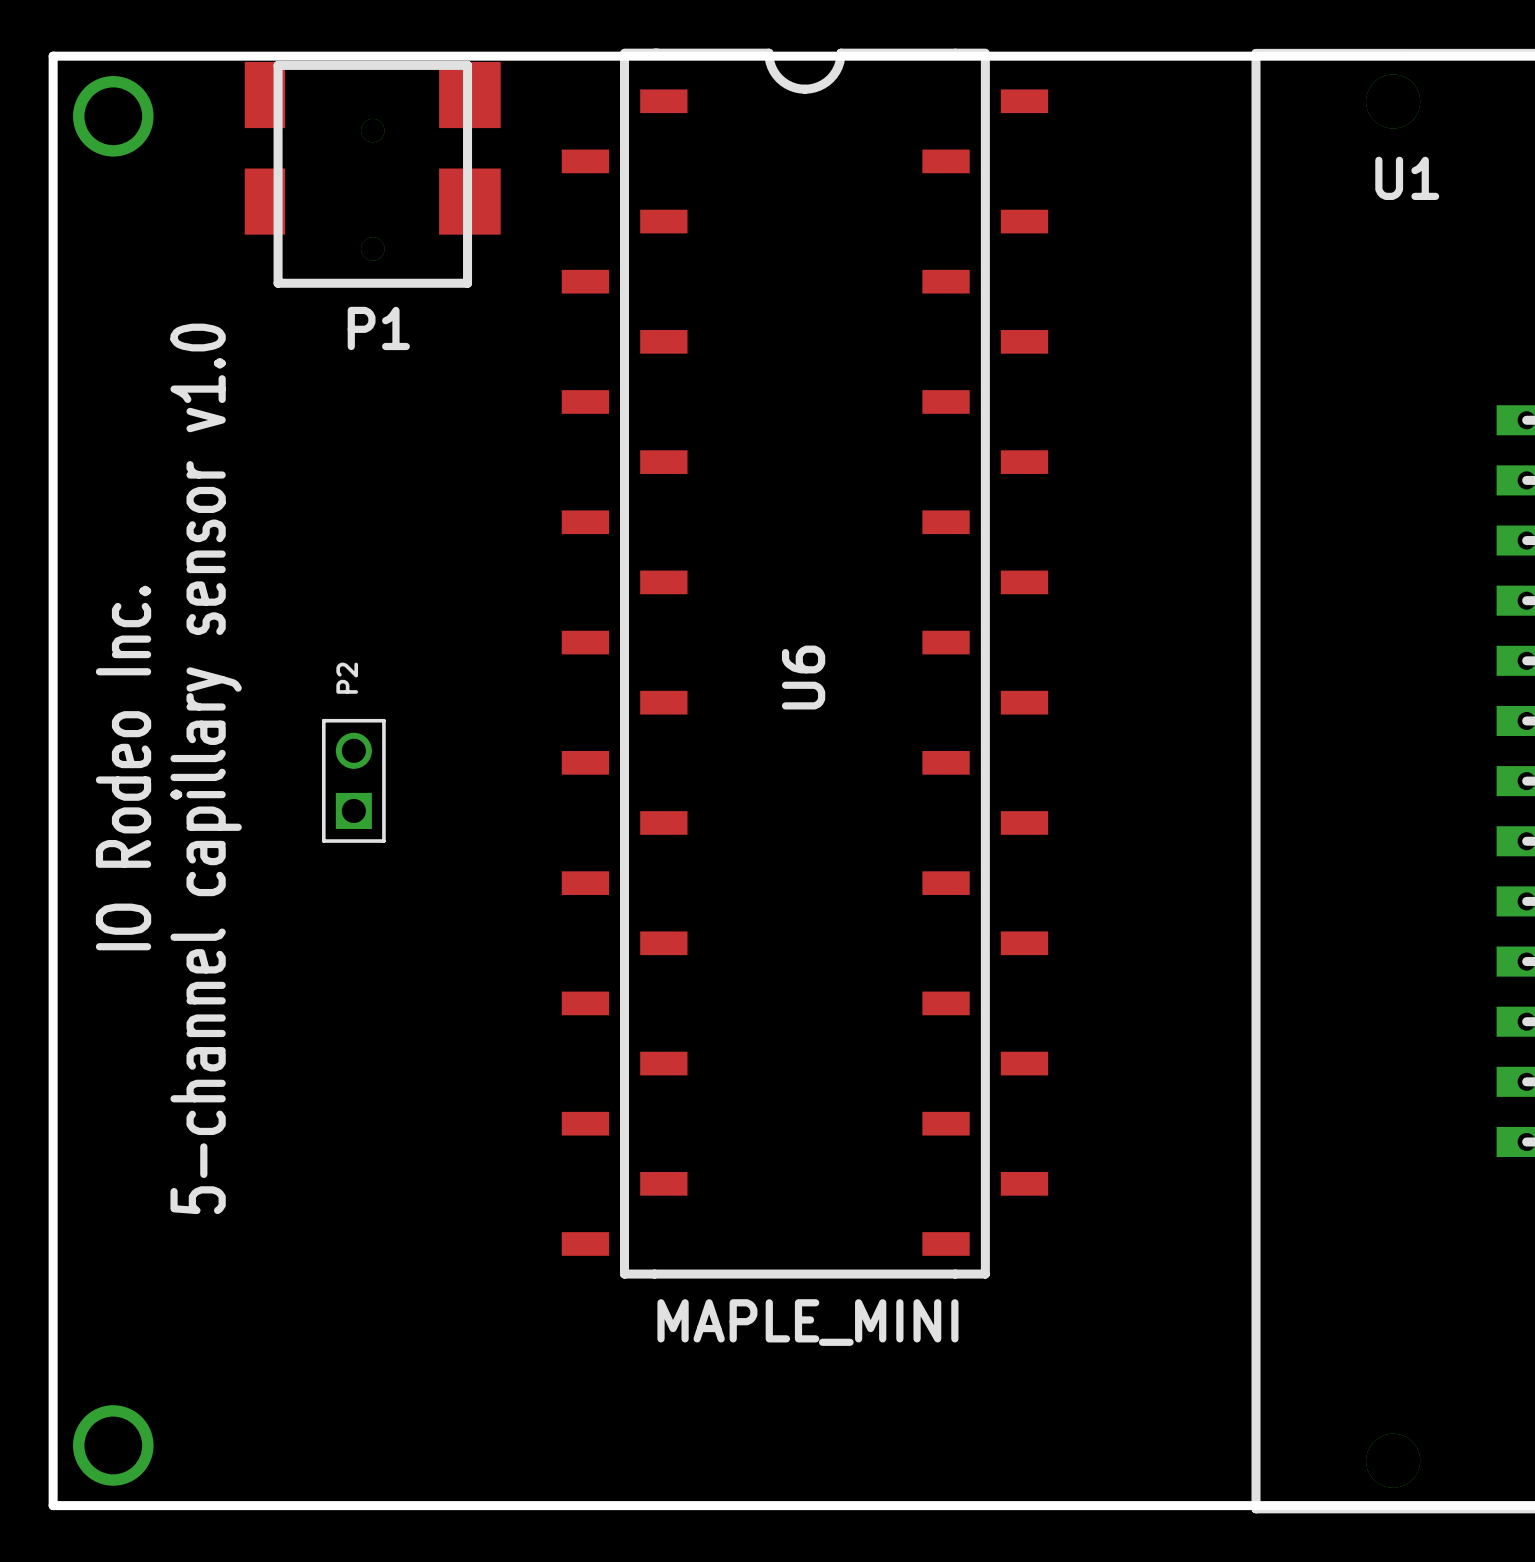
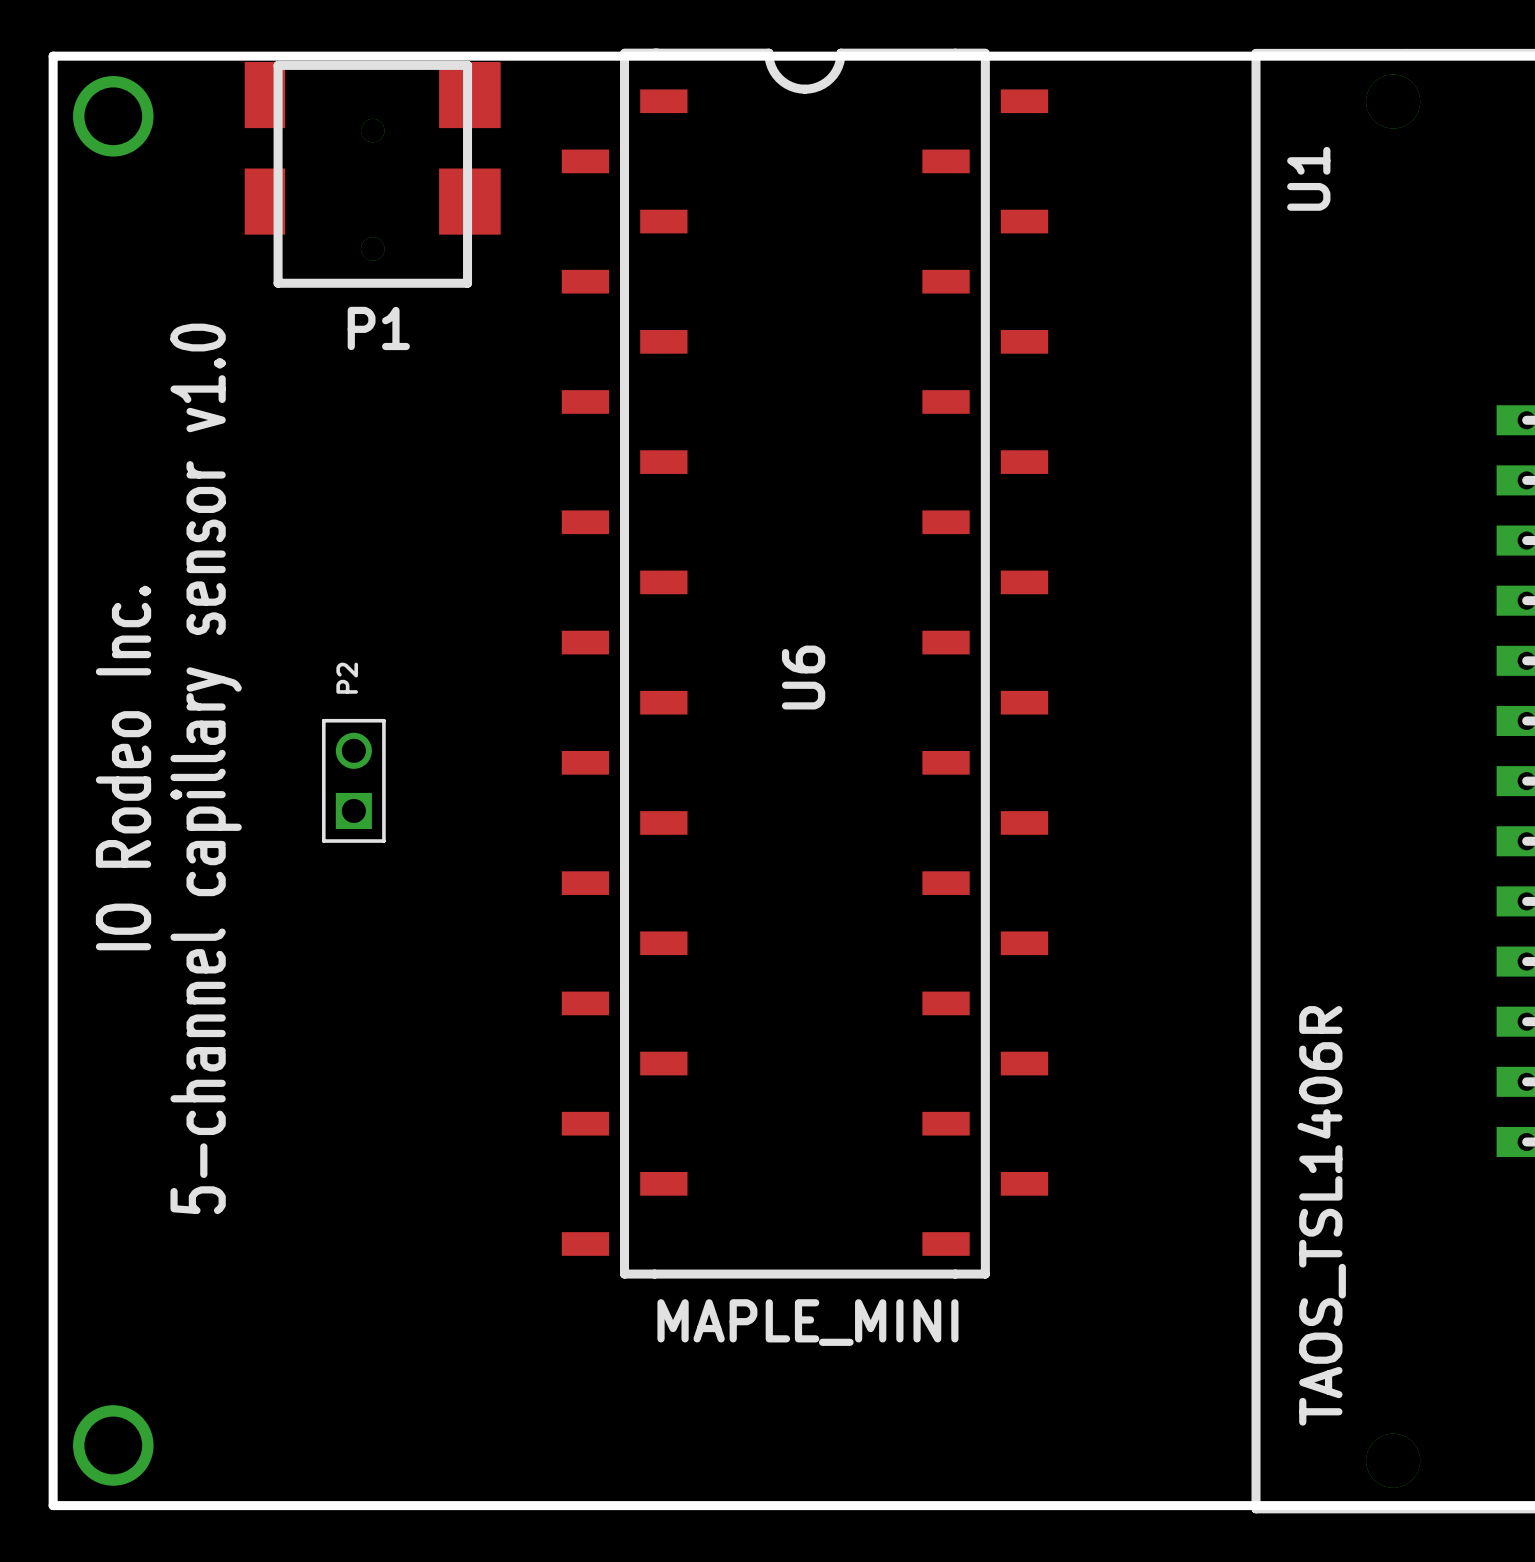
U1 name rotation: 0° (1407, 178) -> 90° counterclockwise (1308, 178)
U1 name position: U1 (1407, 178) -> U1 (1308, 178)
U1 value: none -> TAOS_TSL1406R (1321, 1215)

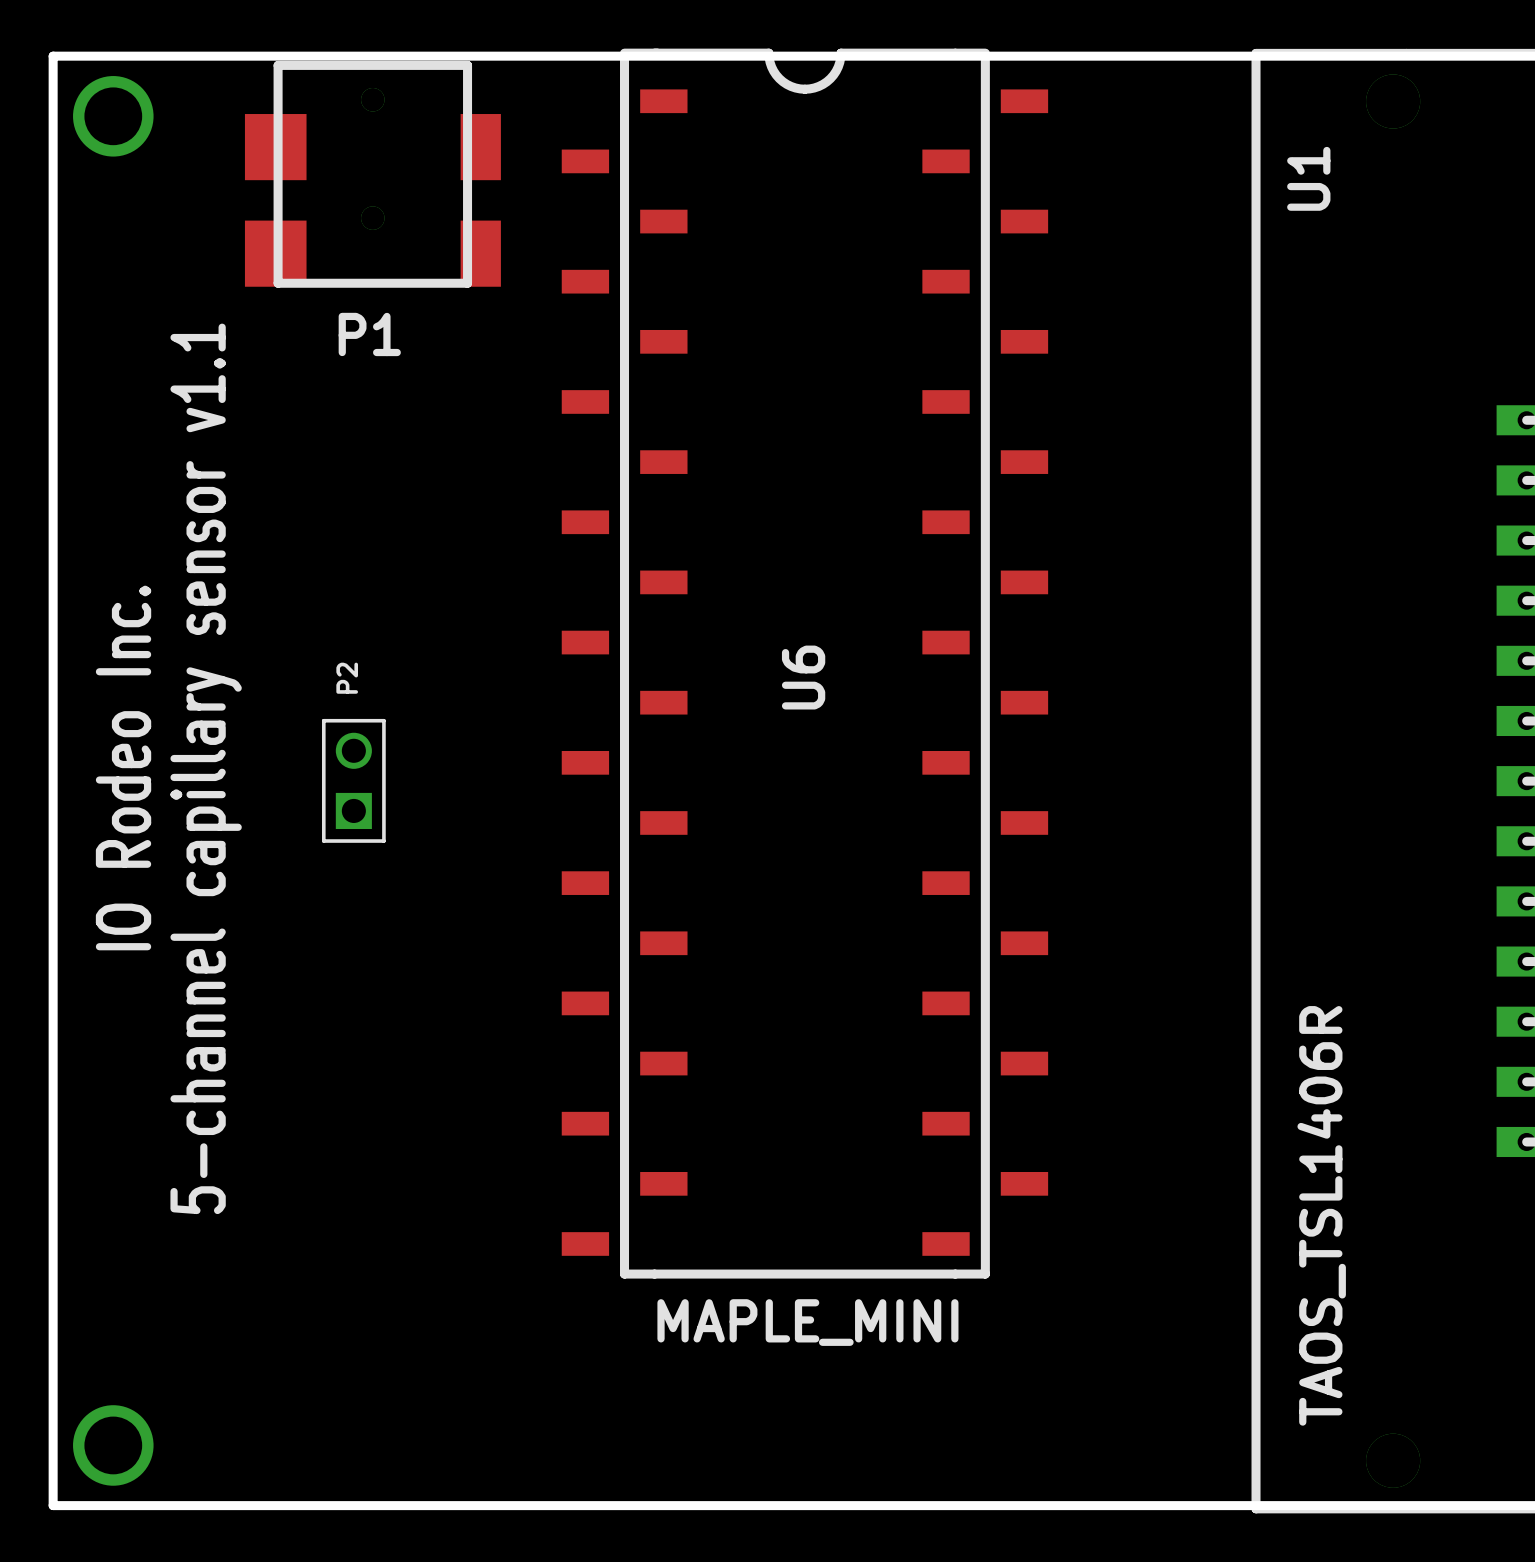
P1 rotation: 0° (372, 174) -> 180° (372, 174)
text: 5-channel capillary sensor v1.0 (206, 768) -> 5-channel capillary sensor v1.1 (206, 768)

